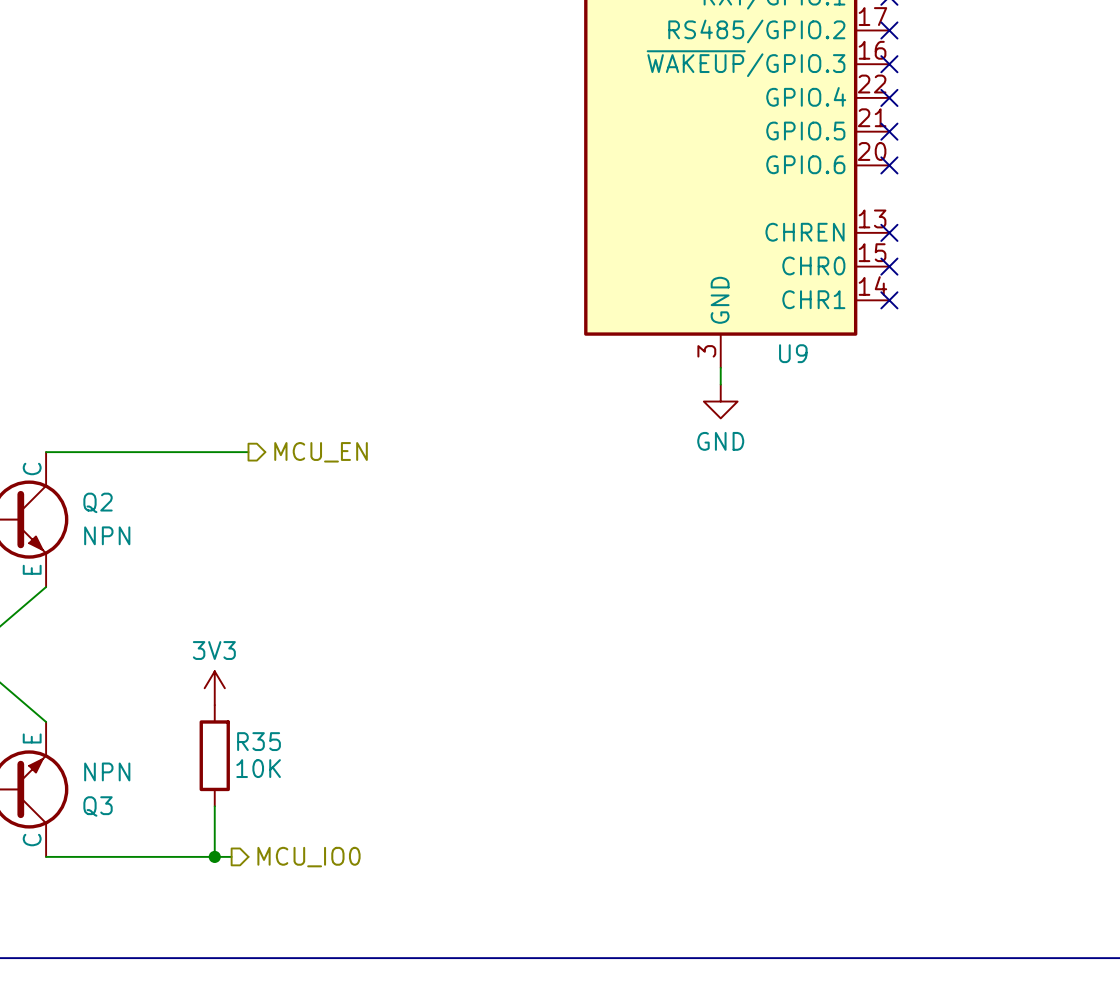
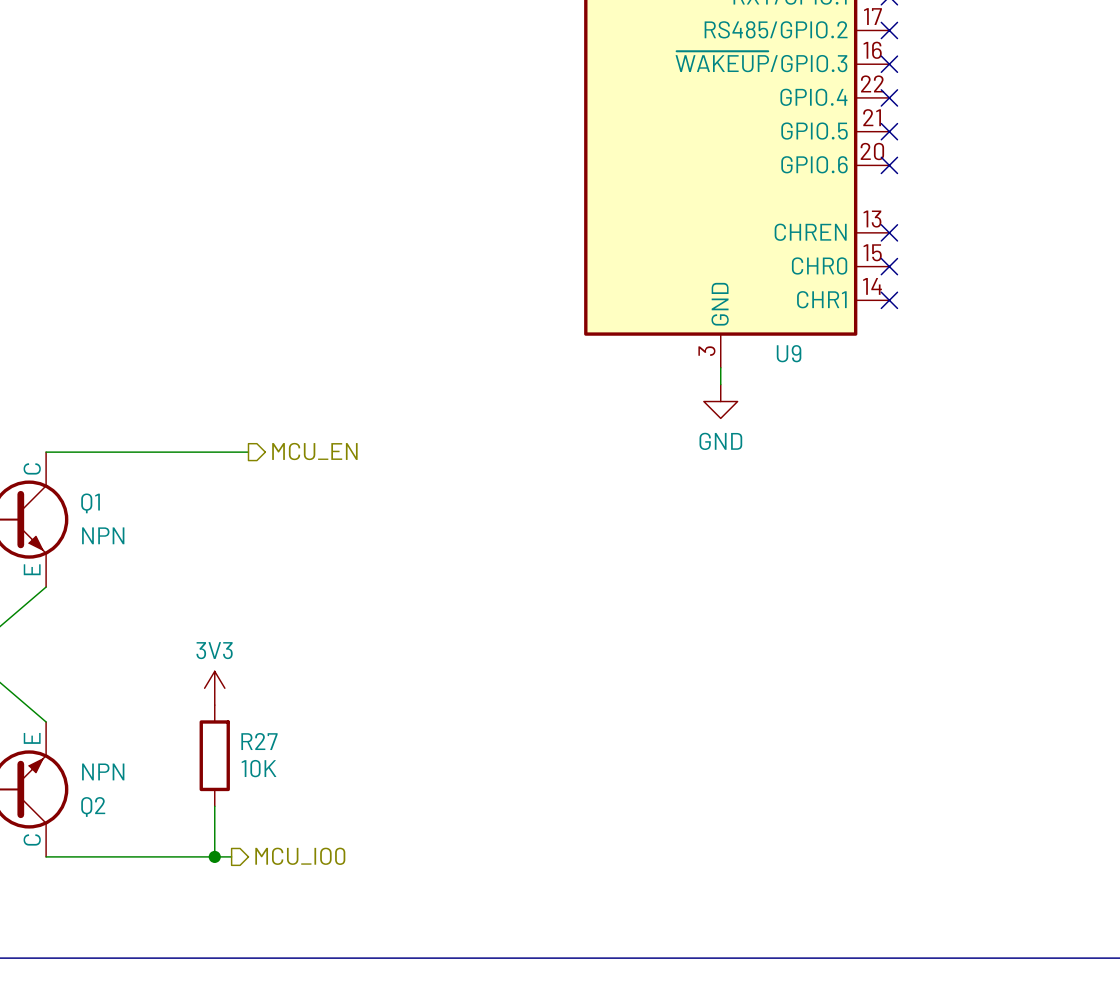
Q2 name: Q2 (98, 502) -> Q1 (90, 503)
R35 name: R35 (259, 741) -> R27 (259, 741)
Q3 name: Q3 (98, 806) -> Q2 (93, 806)

